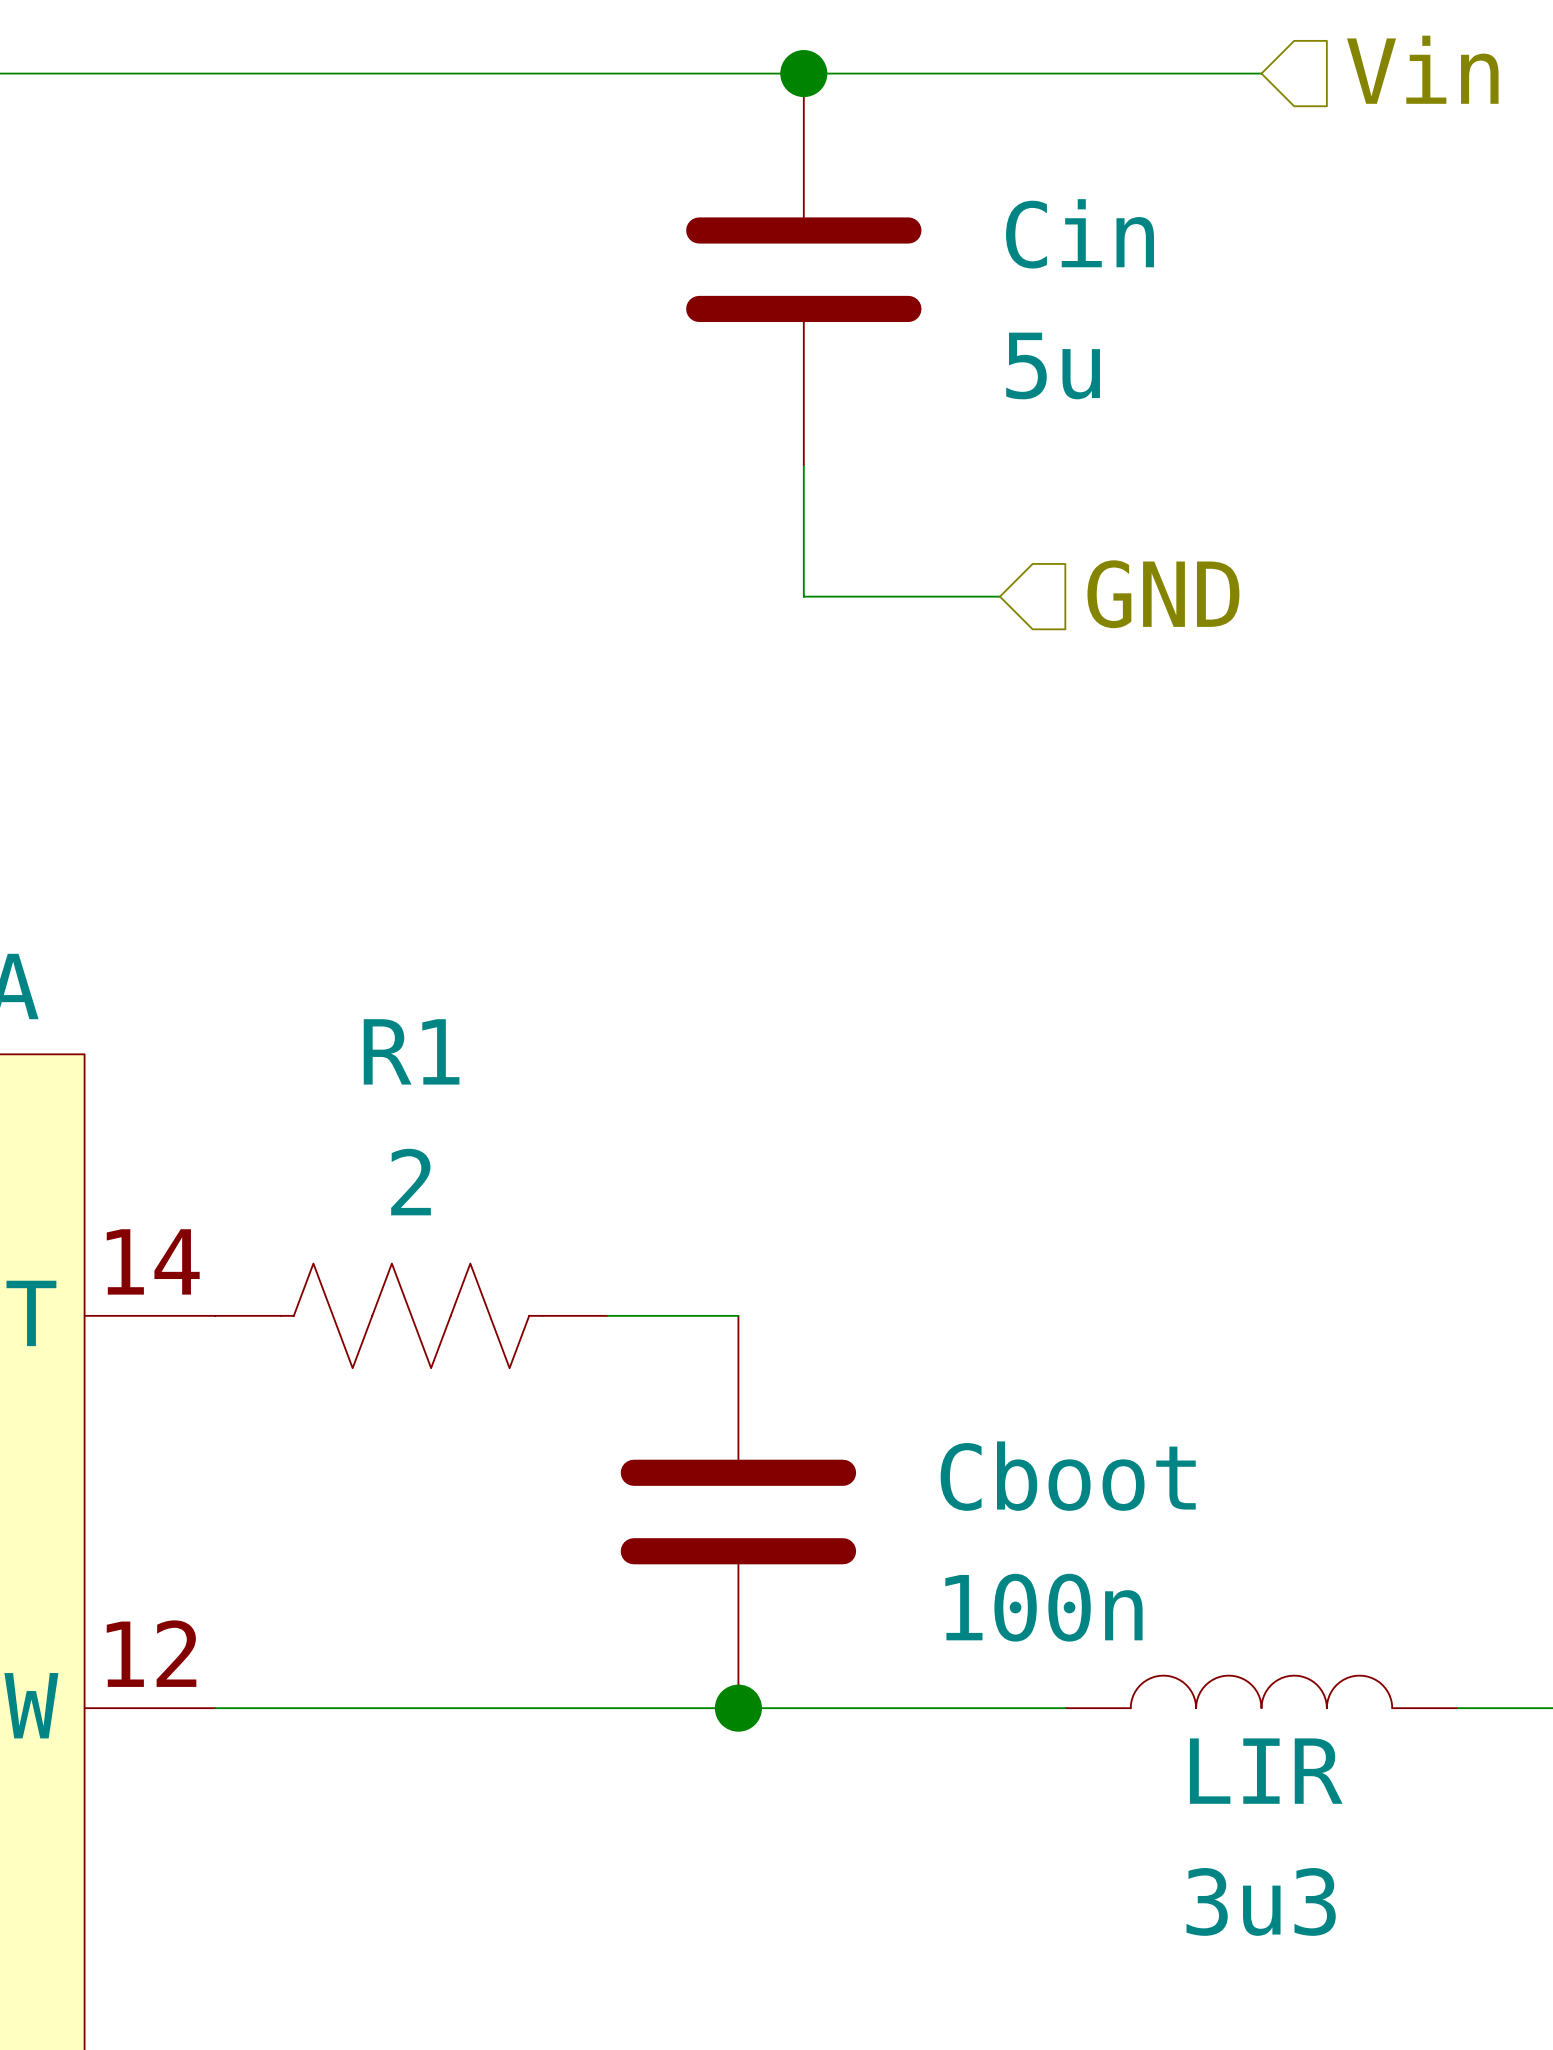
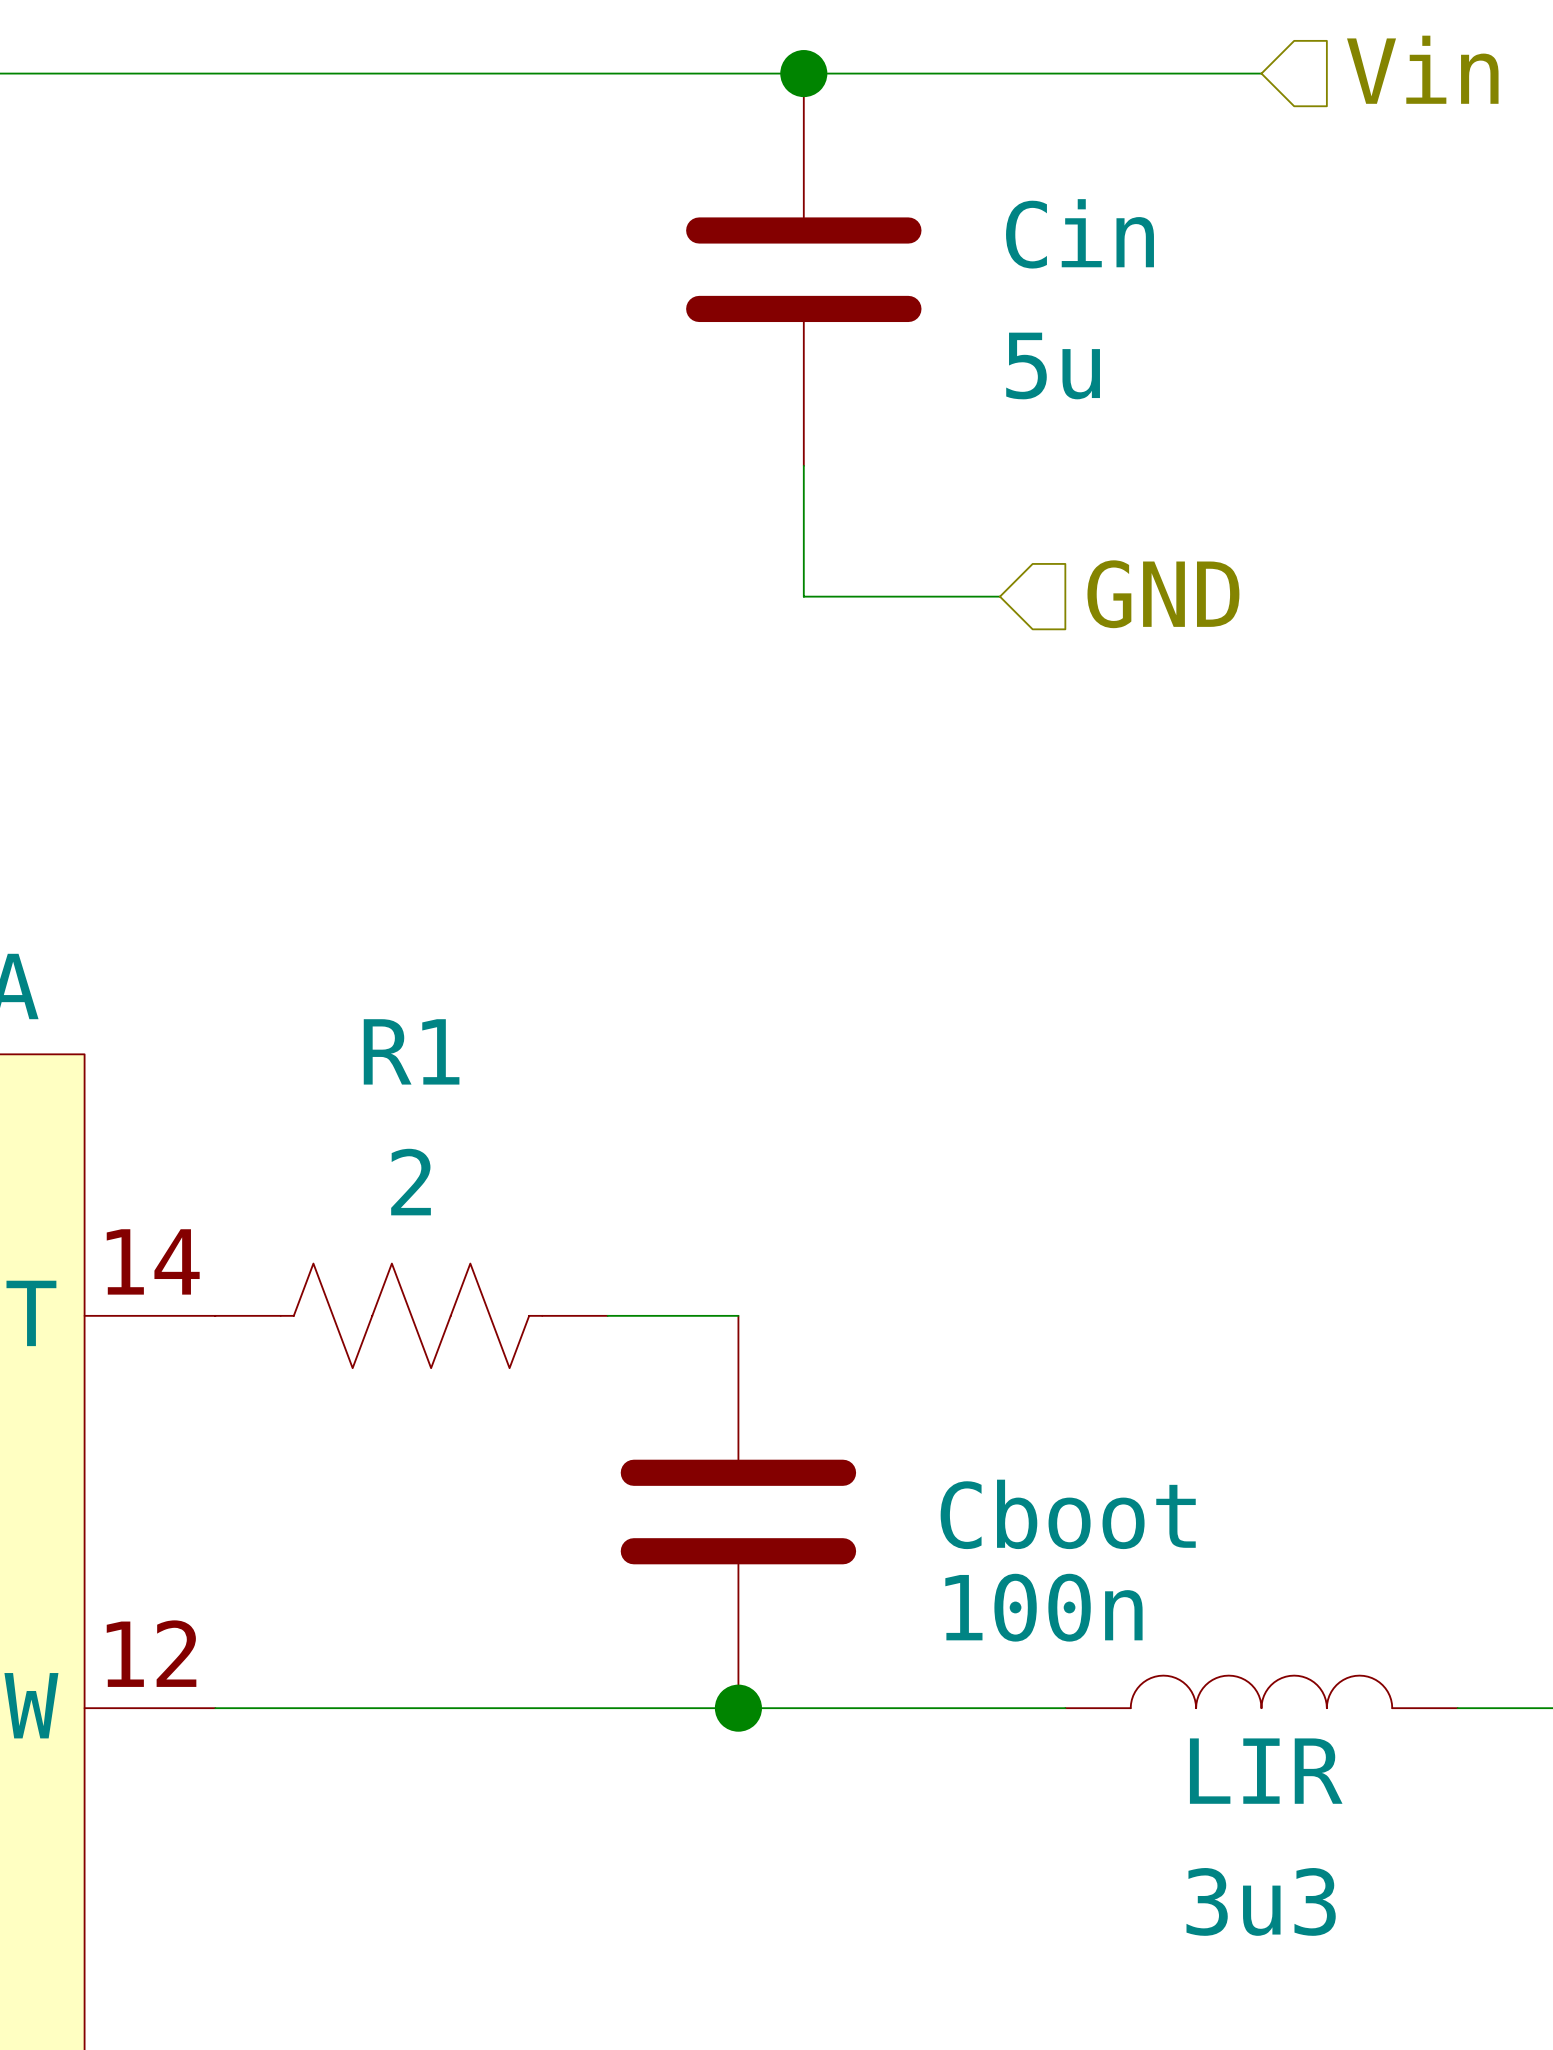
Cboot name position: Cboot (1068, 1476) -> Cboot (1068, 1514)

